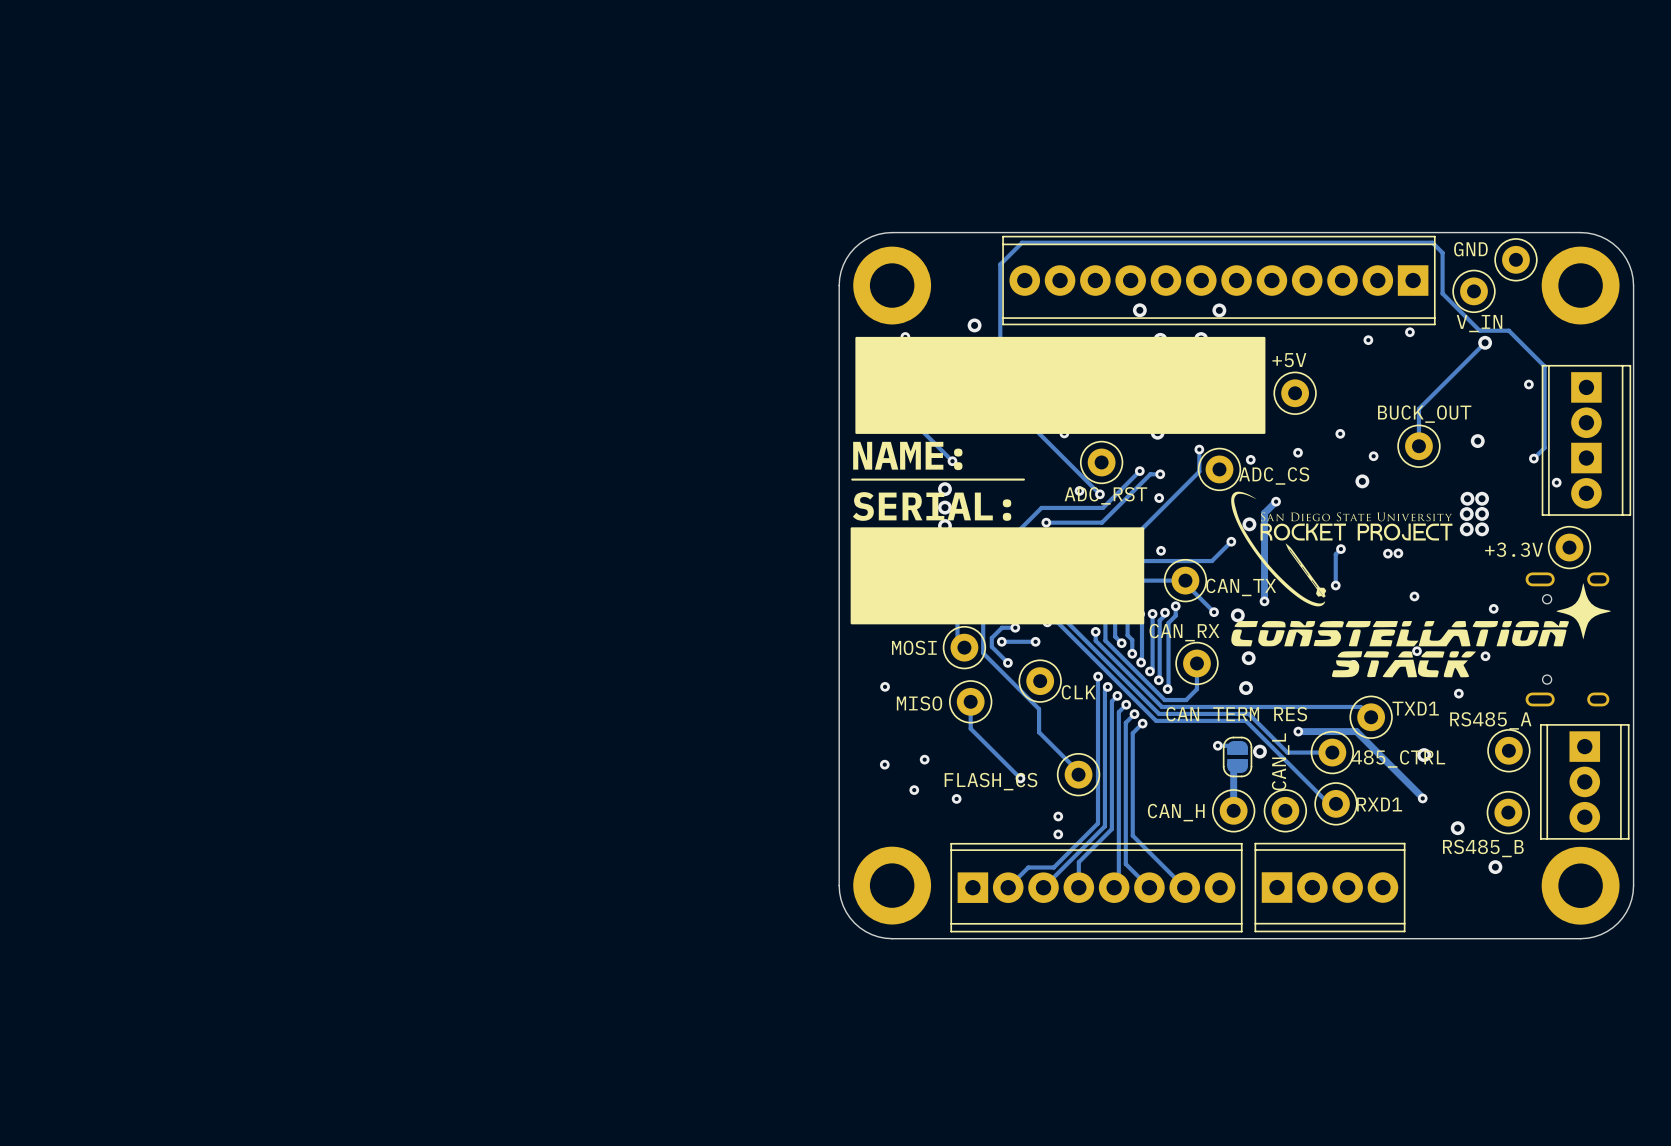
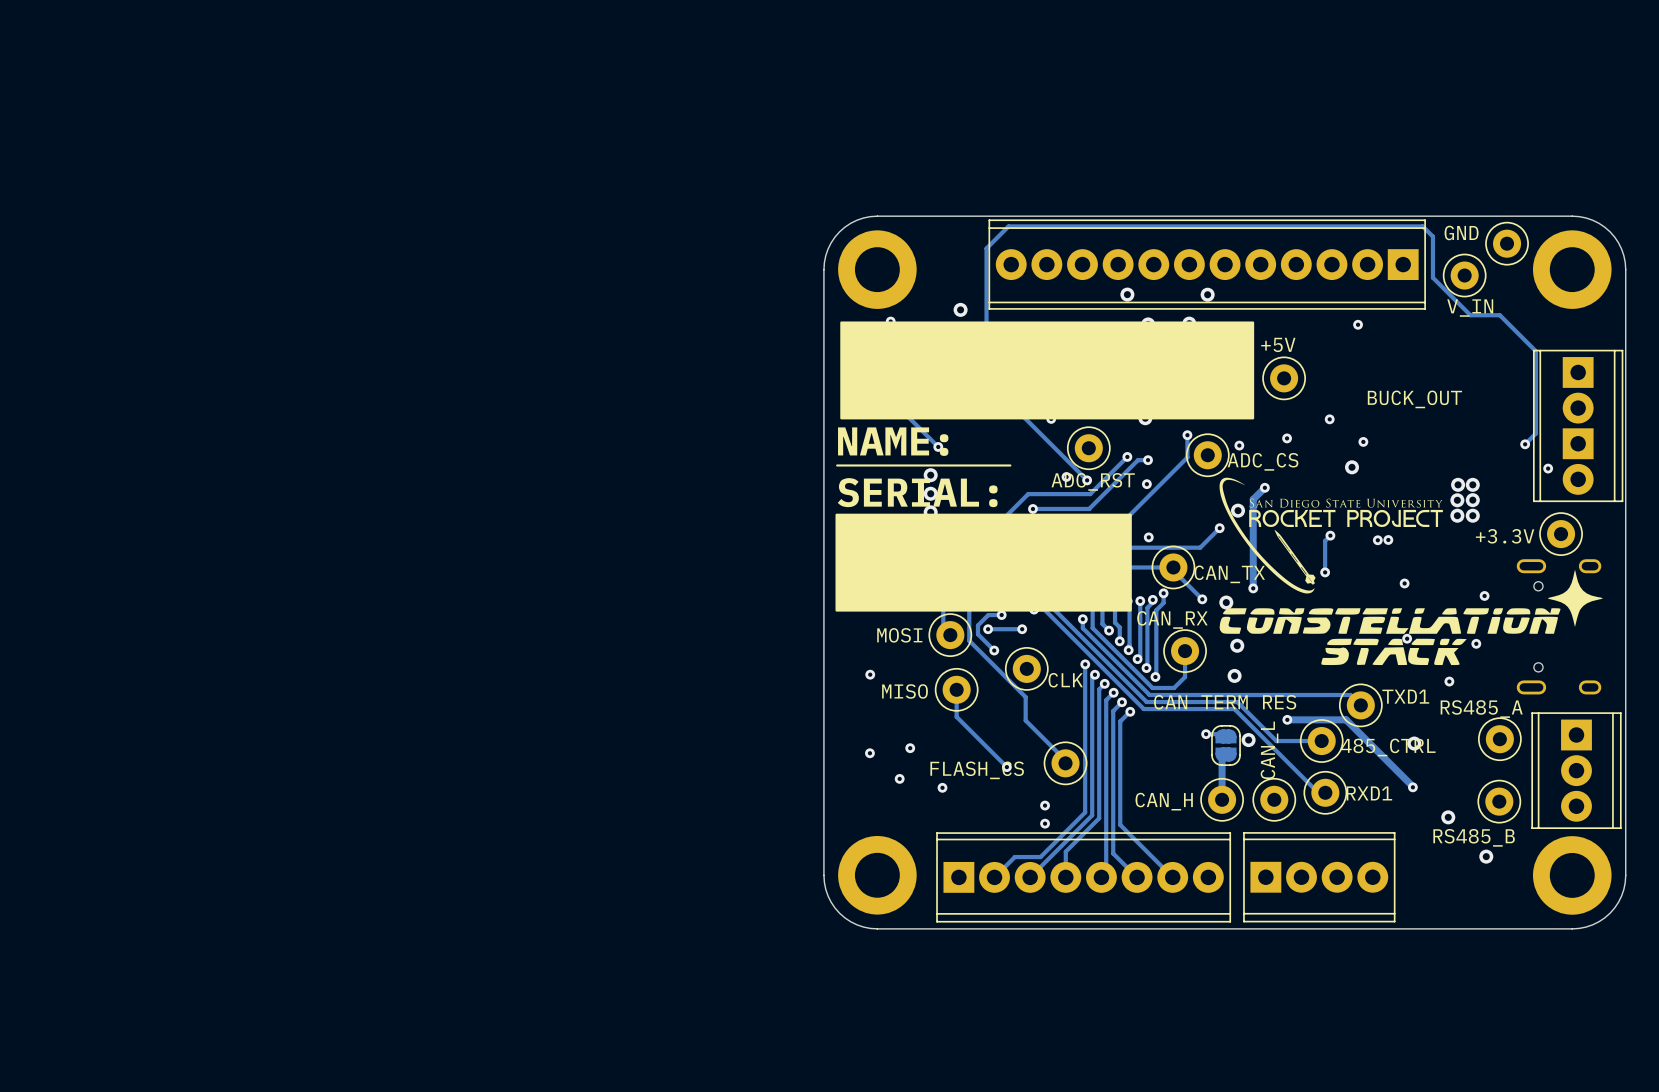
via: (1409, 332) -> none
track: (1485, 342) (1418, 408) (1418, 446) -> none
via: (1485, 342) -> none
via: (1528, 384) -> none
via: (1477, 441) -> none
part: (1418, 446) -> none

